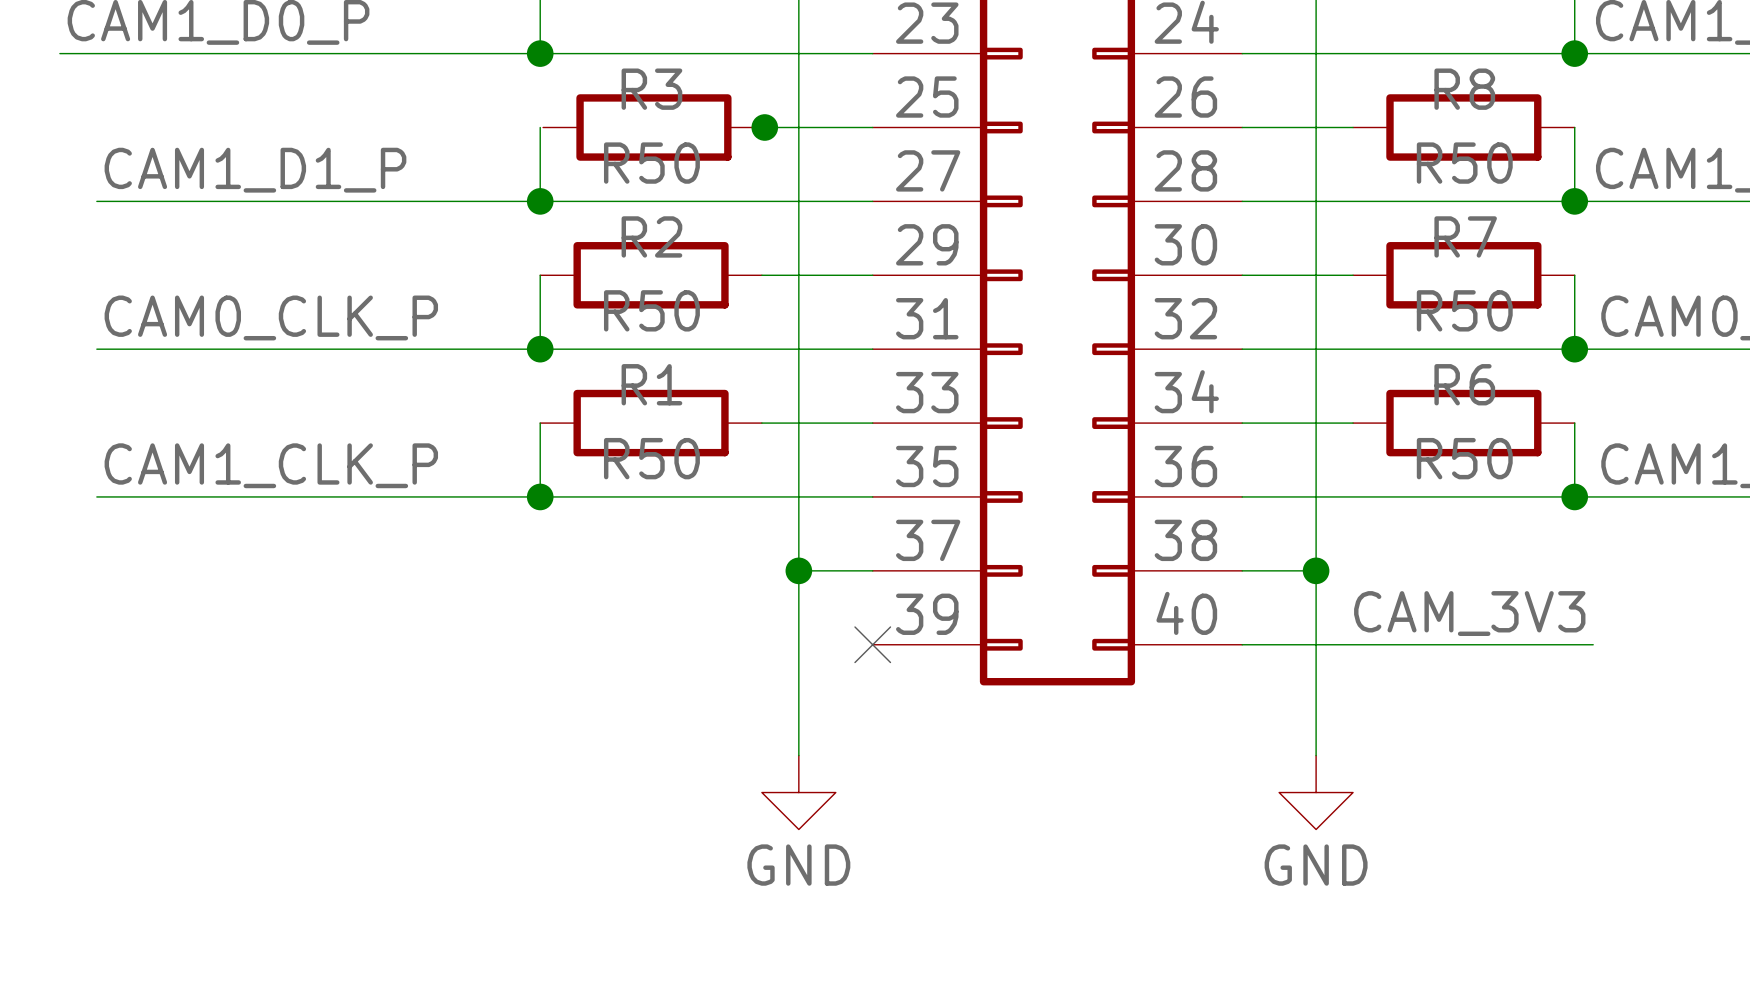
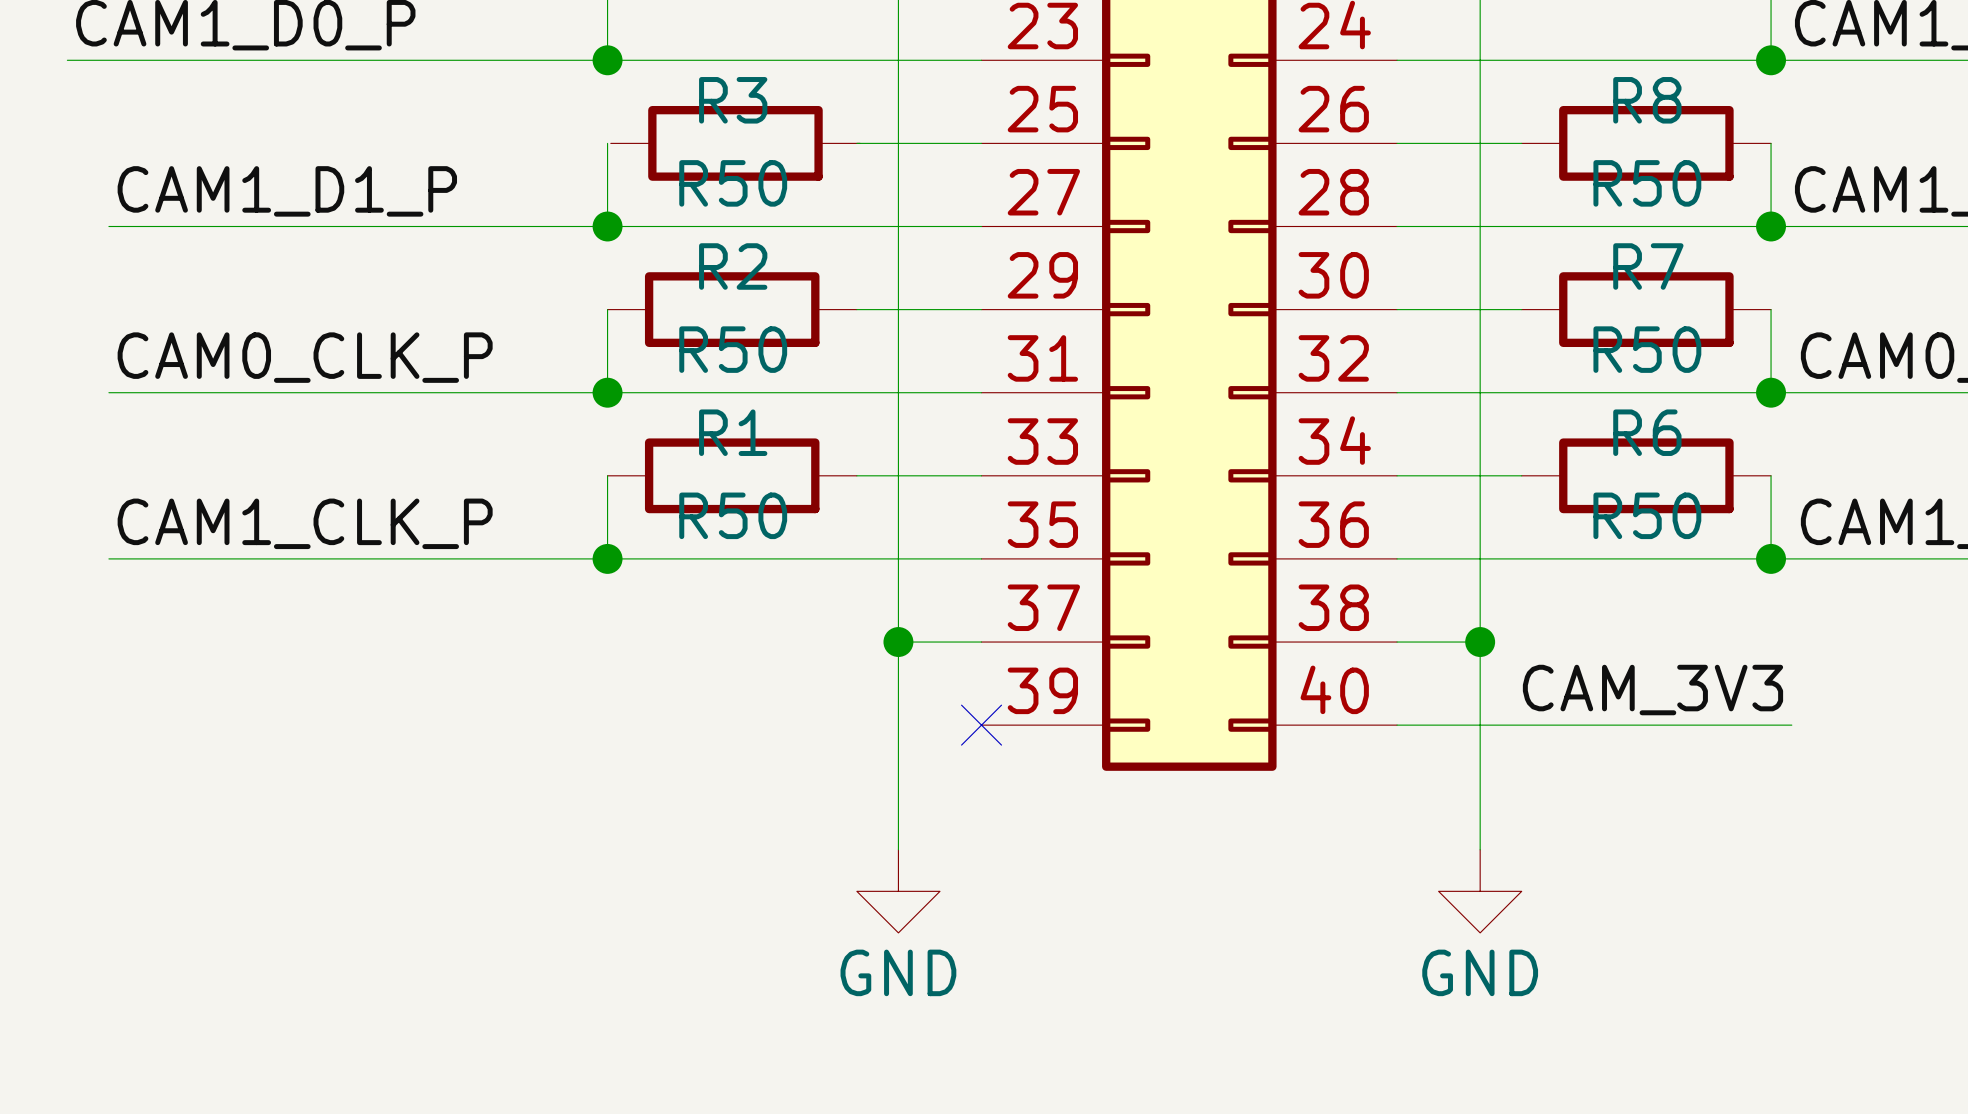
junction: (764, 127) -> none

